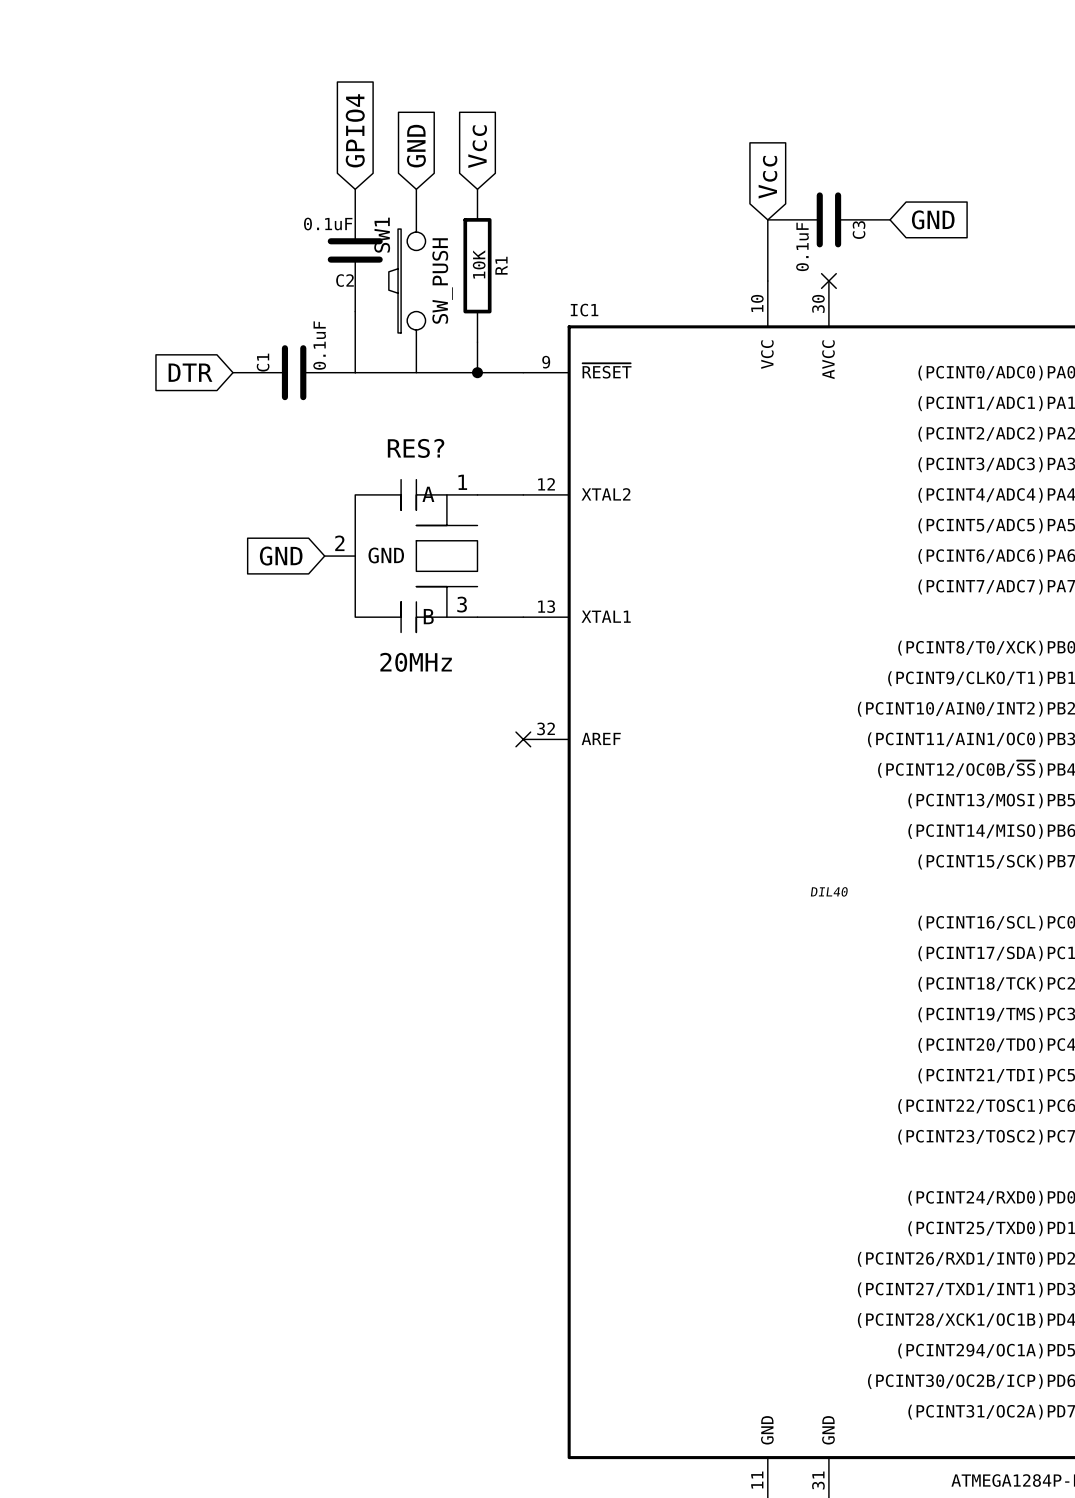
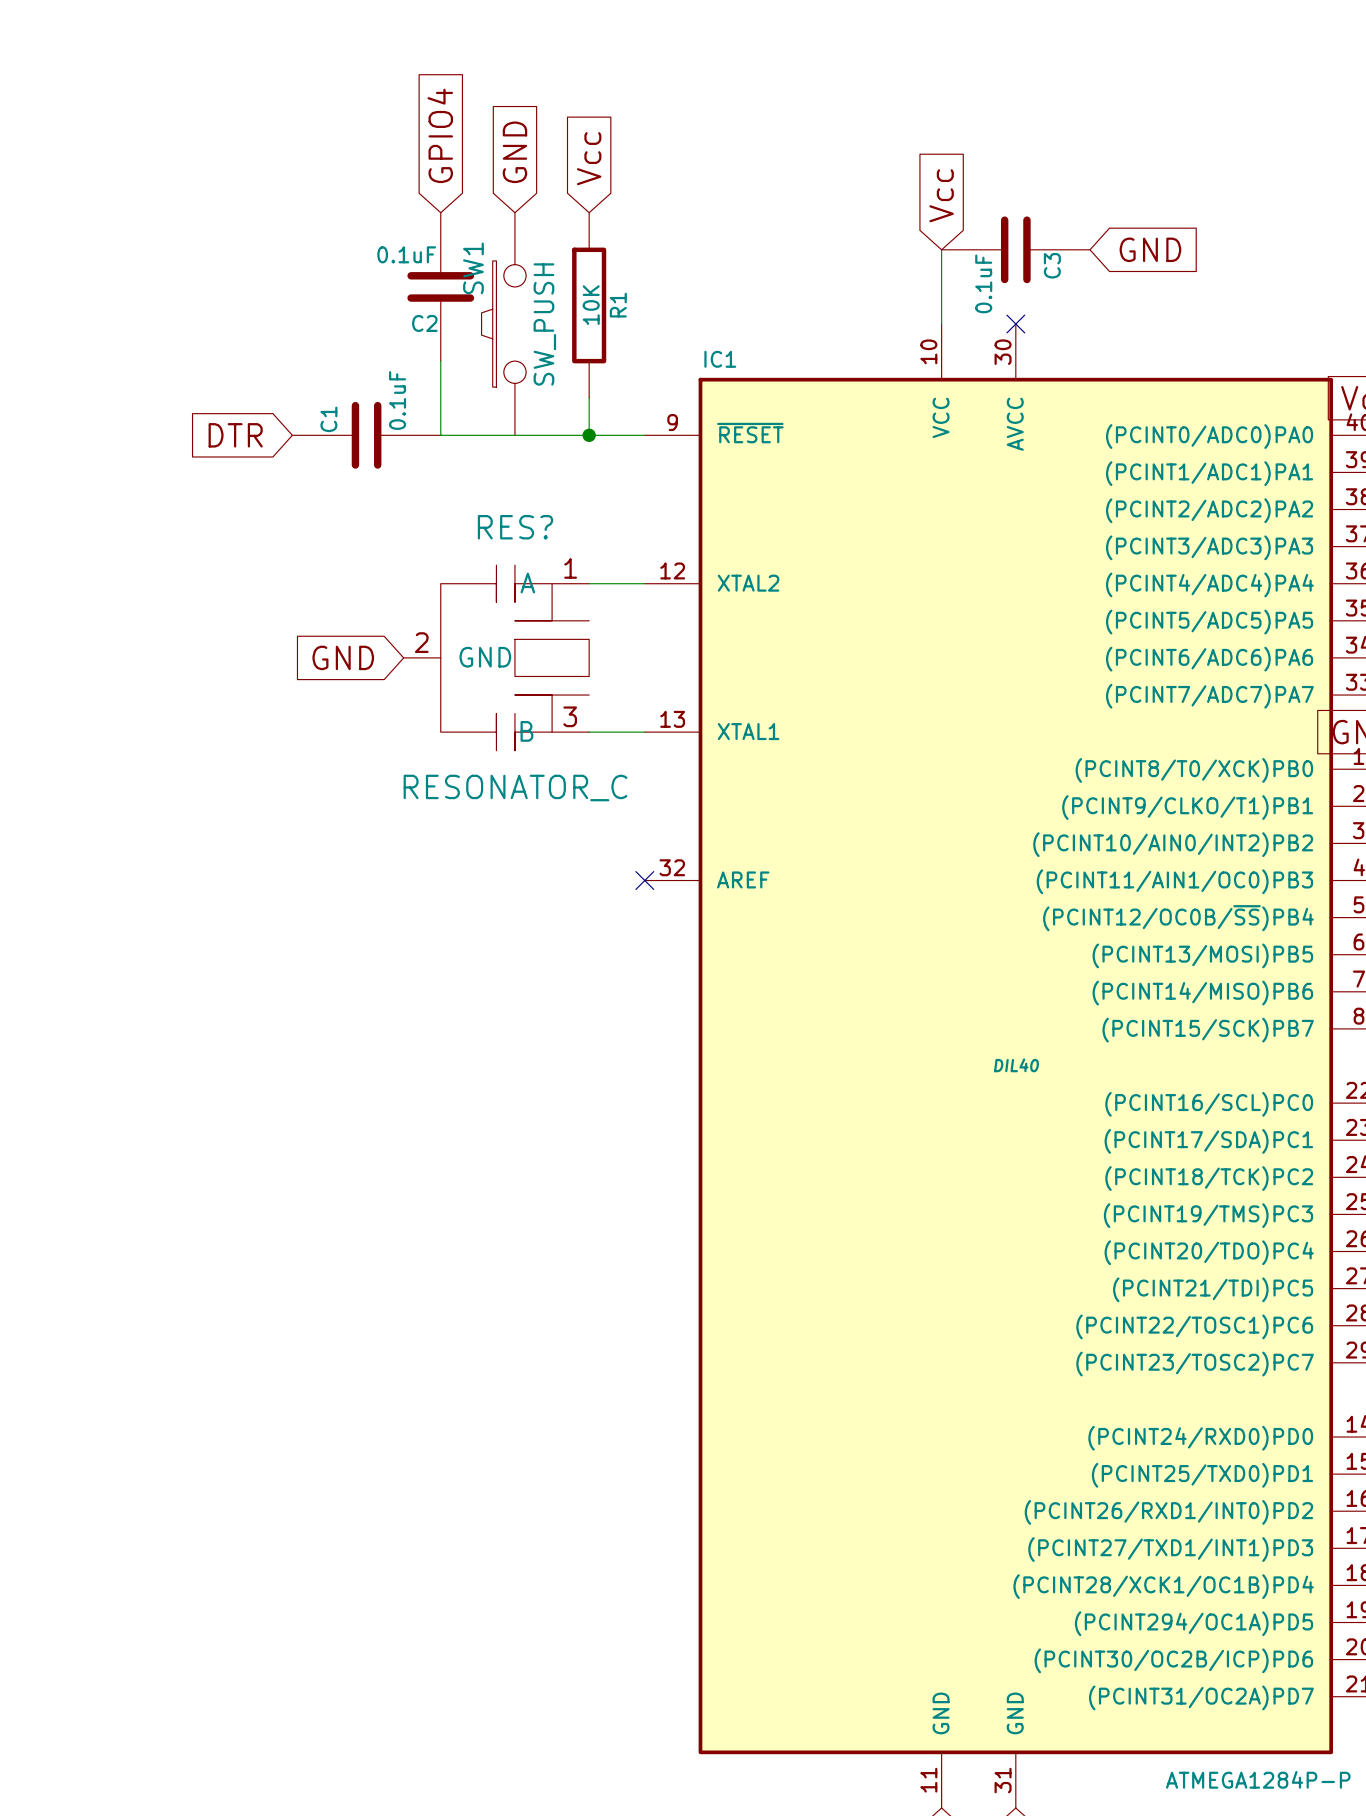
RES? value: 20MHz (416, 662) -> RESONATOR_C (515, 787)

